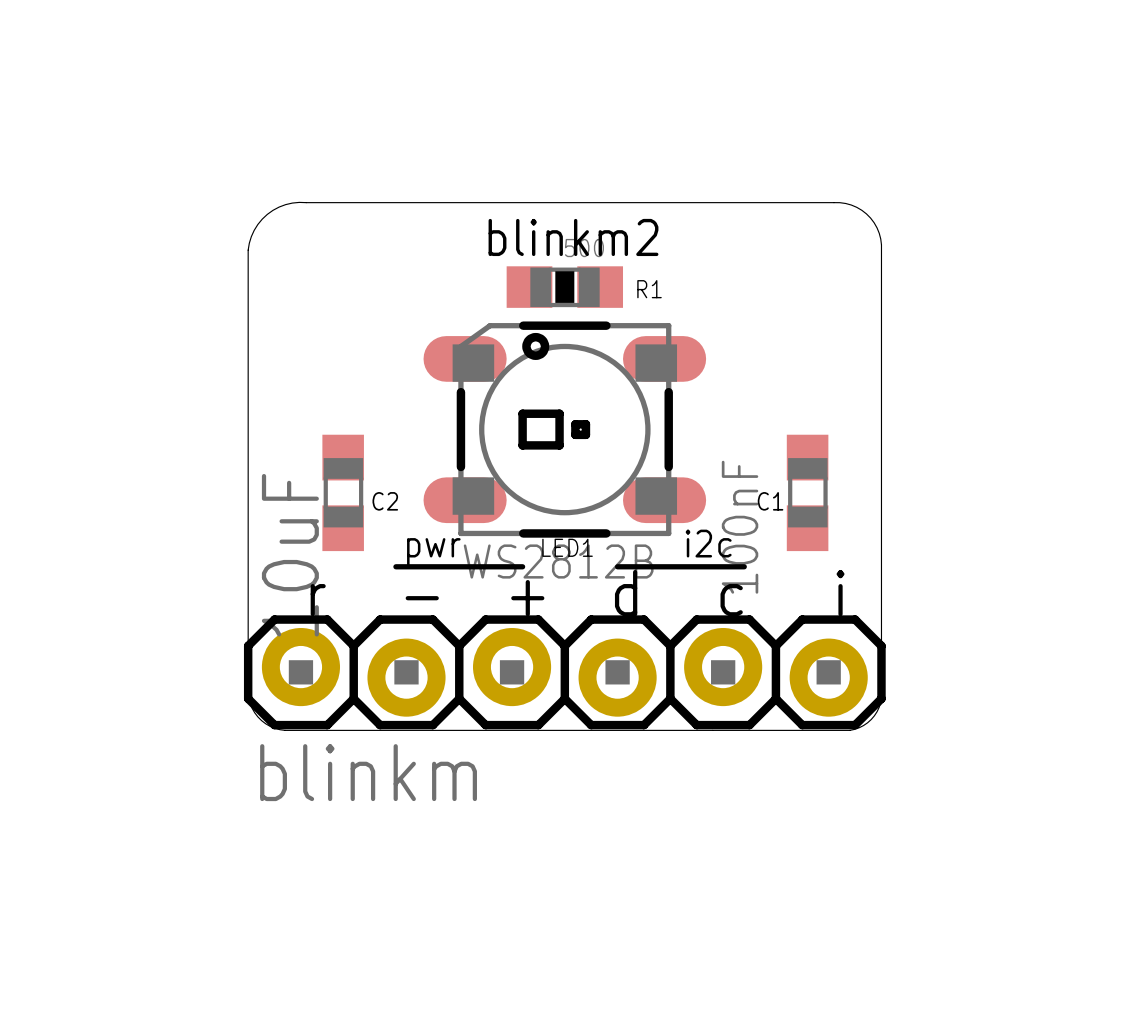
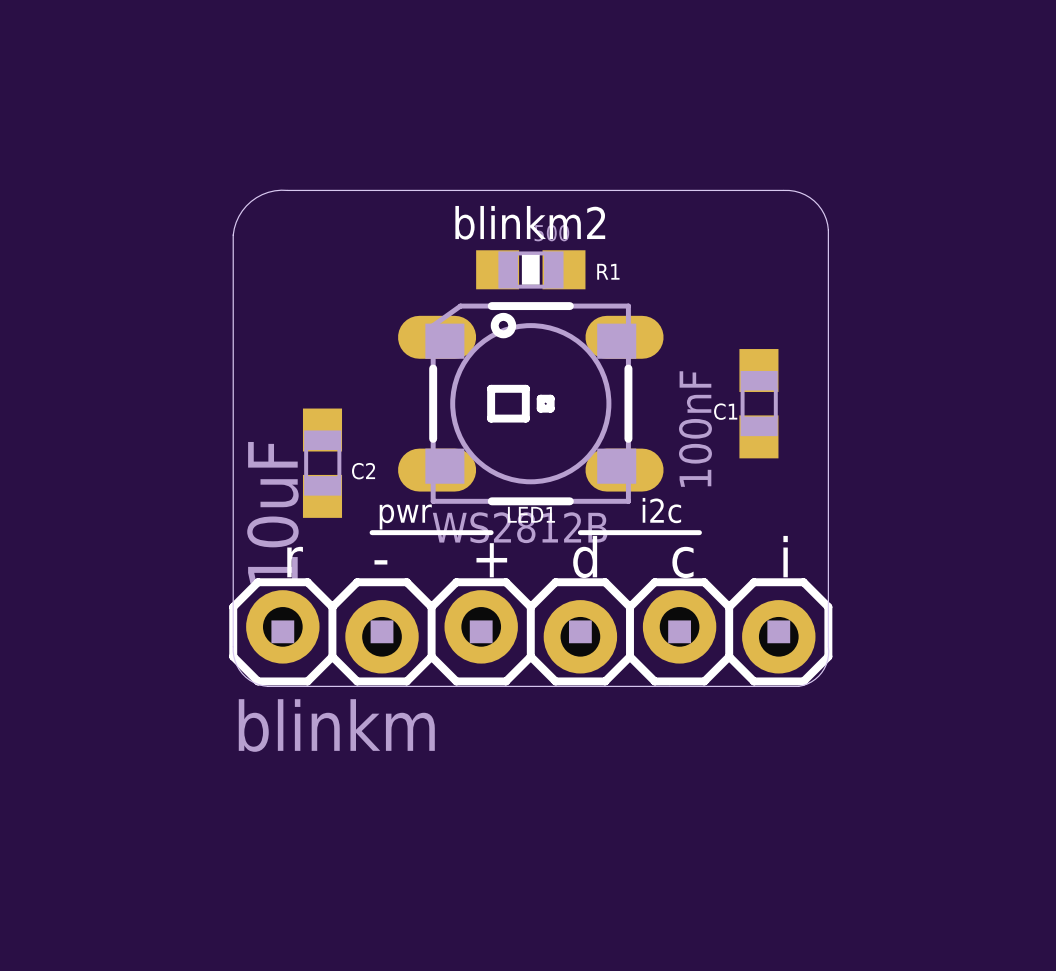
C1 position: (807, 492) -> (758, 403)

